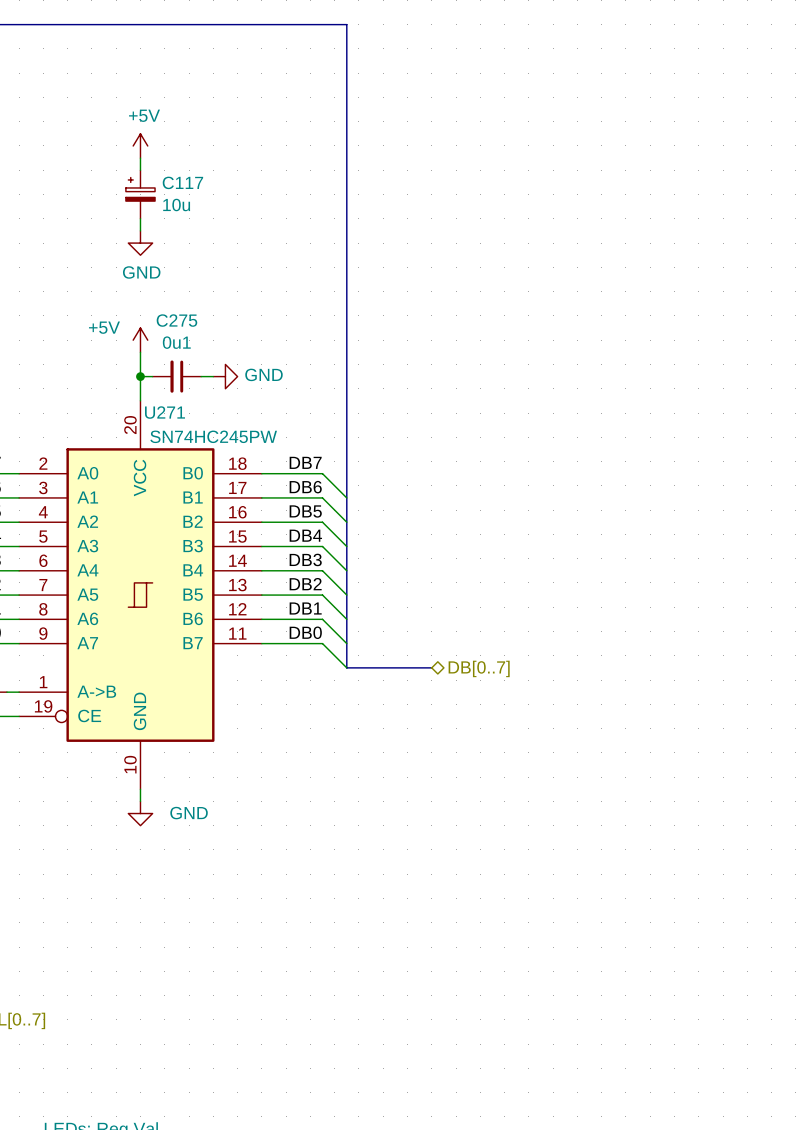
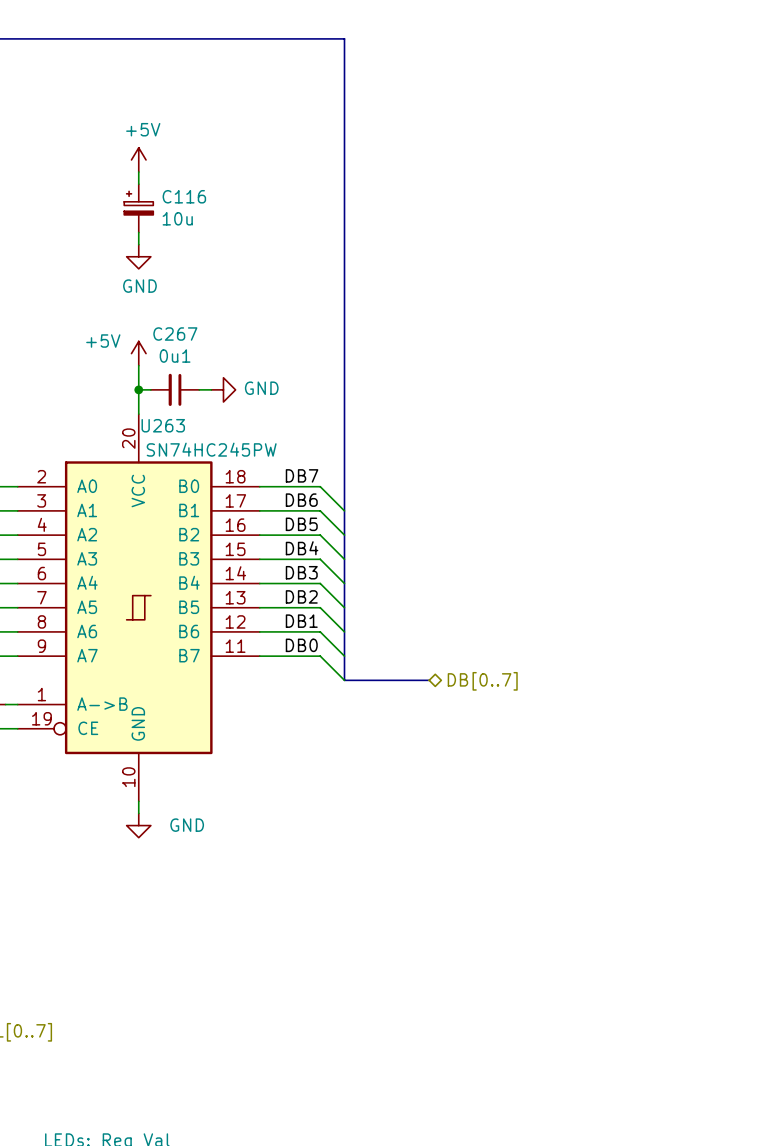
C117 name: C117 (182, 182) -> C116 (184, 196)
C275 name: C275 (176, 320) -> C267 (175, 334)
U271 name: U271 (165, 412) -> U263 (163, 425)

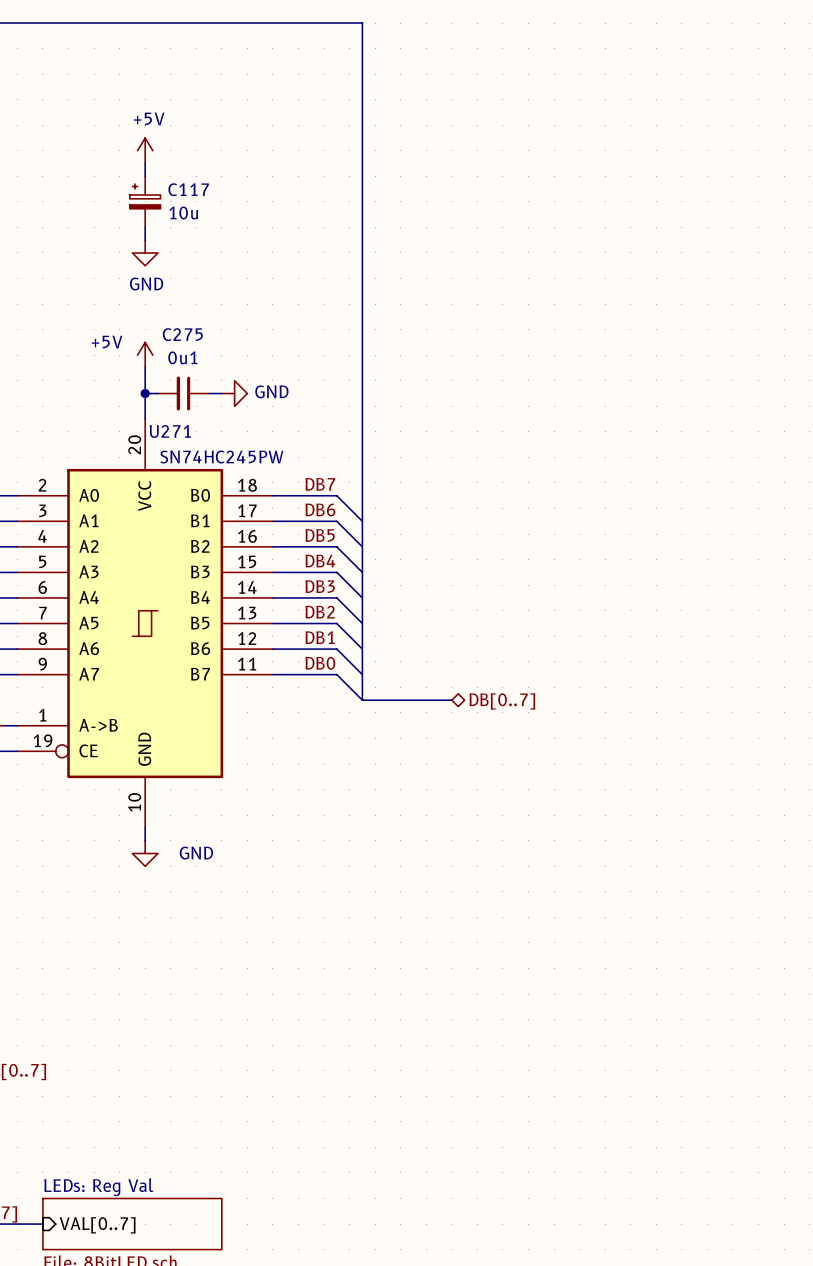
C116 name: C116 (184, 196) -> C117 (188, 189)
C267 name: C267 (175, 334) -> C275 (182, 334)
U263 name: U263 (163, 425) -> U271 (170, 431)

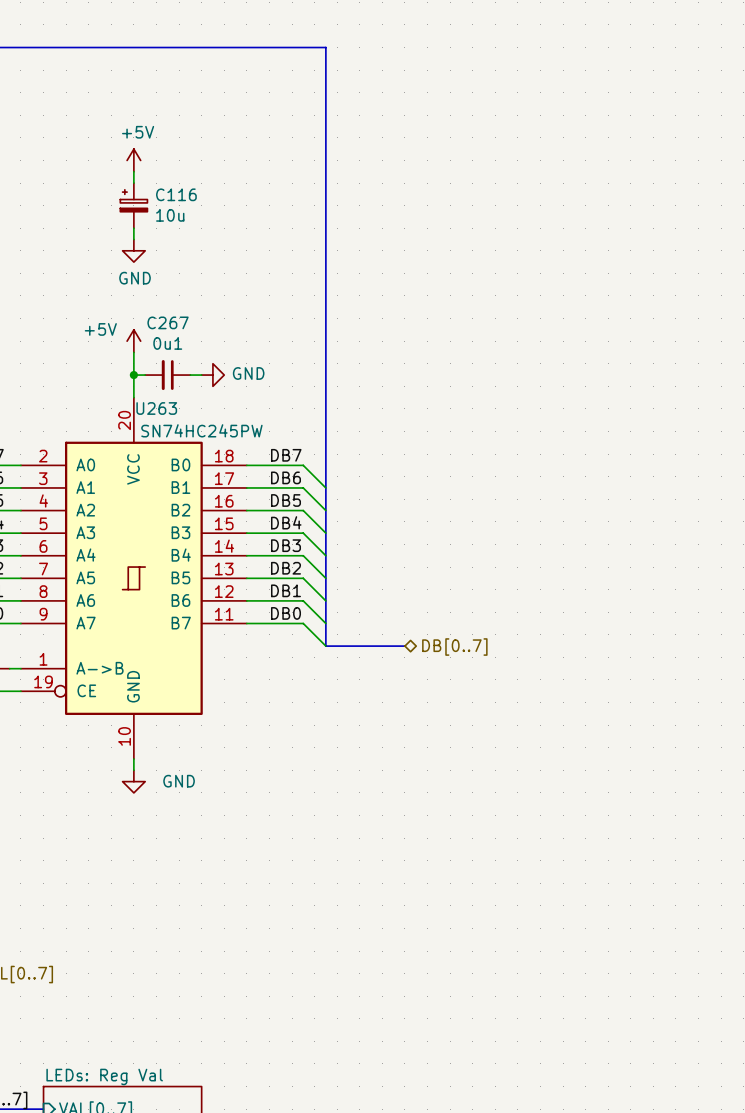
C117 name: C117 (188, 189) -> C116 (176, 194)
C275 name: C275 (182, 334) -> C267 (168, 322)
U271 name: U271 (170, 431) -> U263 (156, 408)

